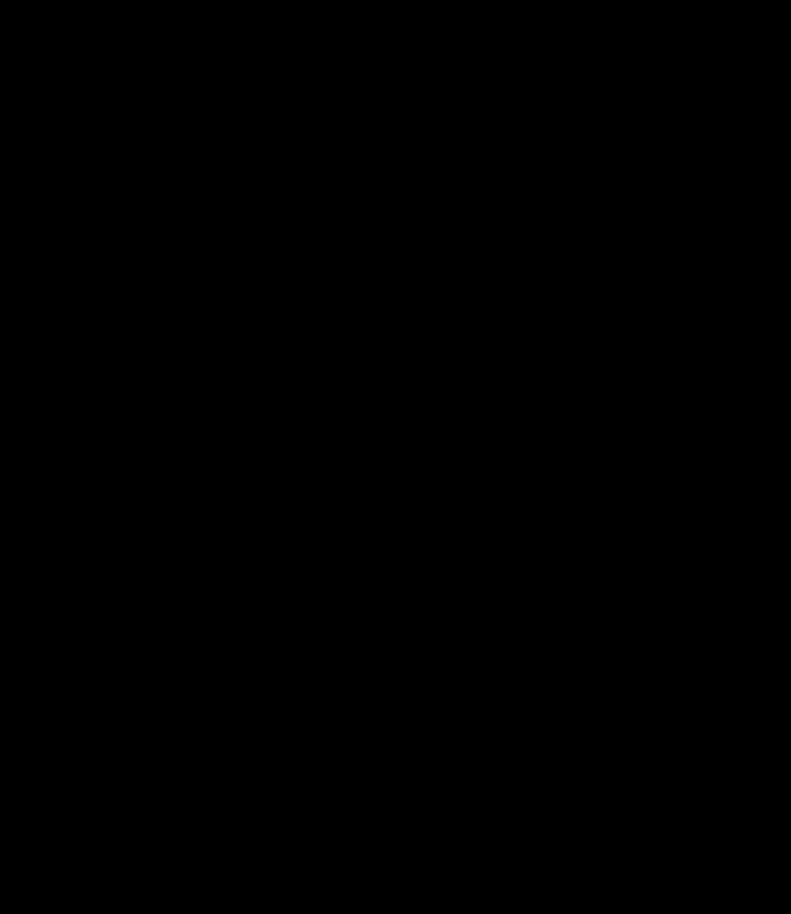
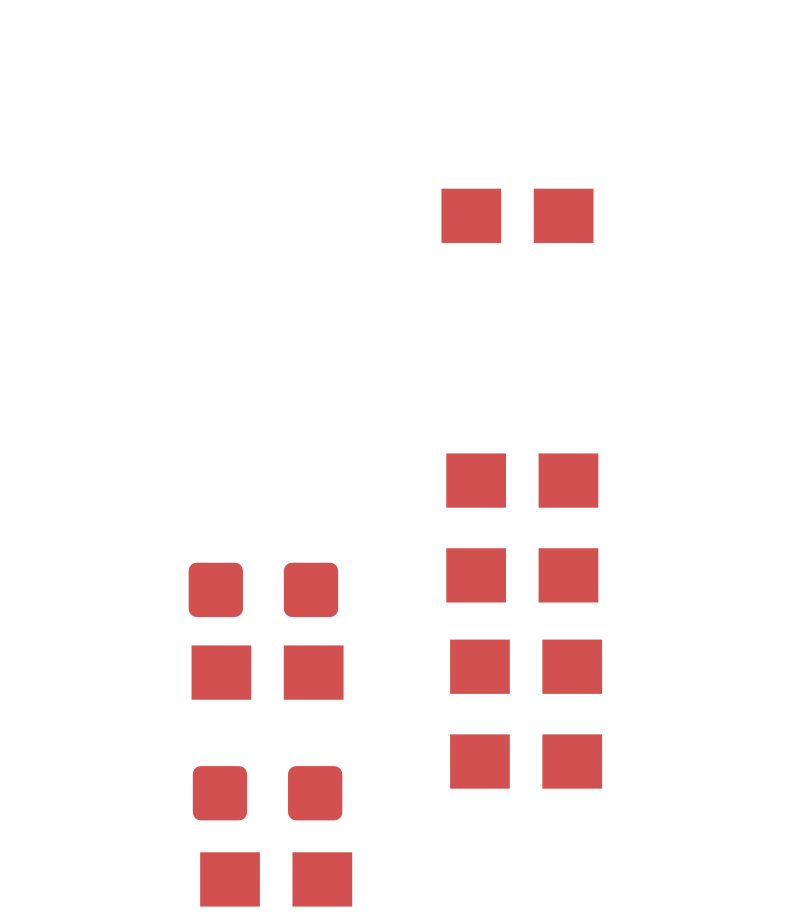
part: none -> (517, 215)
part: none -> (522, 480)
part: none -> (522, 575)
part: none -> (263, 589)
part: none -> (526, 666)
part: none -> (267, 672)
part: none -> (526, 761)
part: none -> (267, 793)
part: none -> (276, 879)

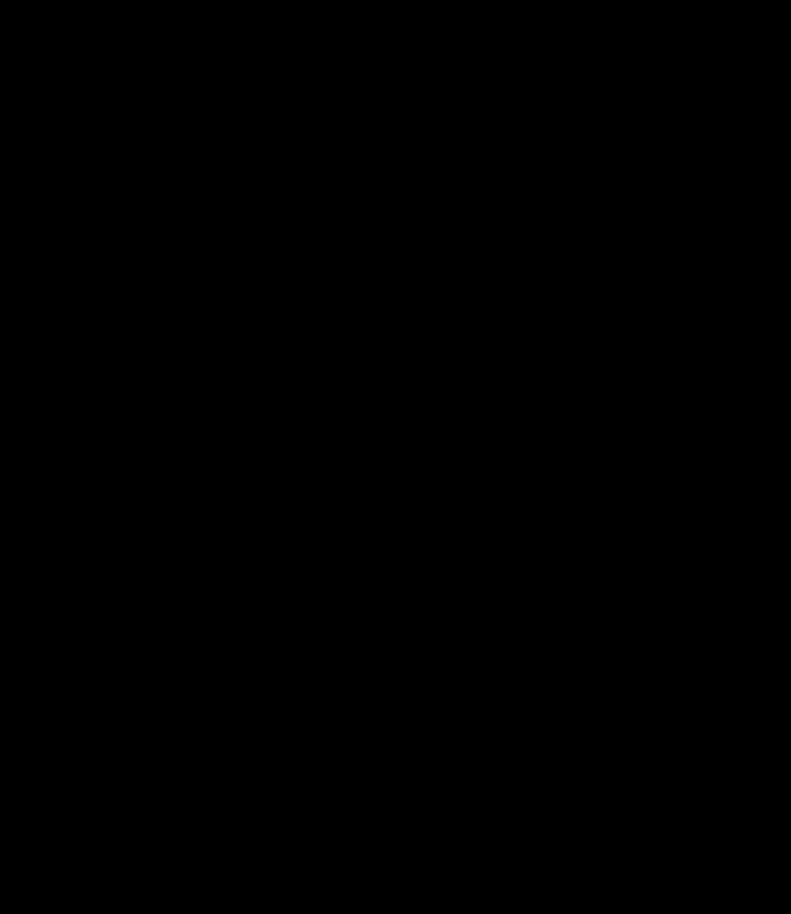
part: (517, 215) -> none
part: (522, 480) -> none
part: (522, 575) -> none
part: (263, 589) -> none
part: (526, 666) -> none
part: (267, 672) -> none
part: (526, 761) -> none
part: (267, 793) -> none
part: (276, 879) -> none

